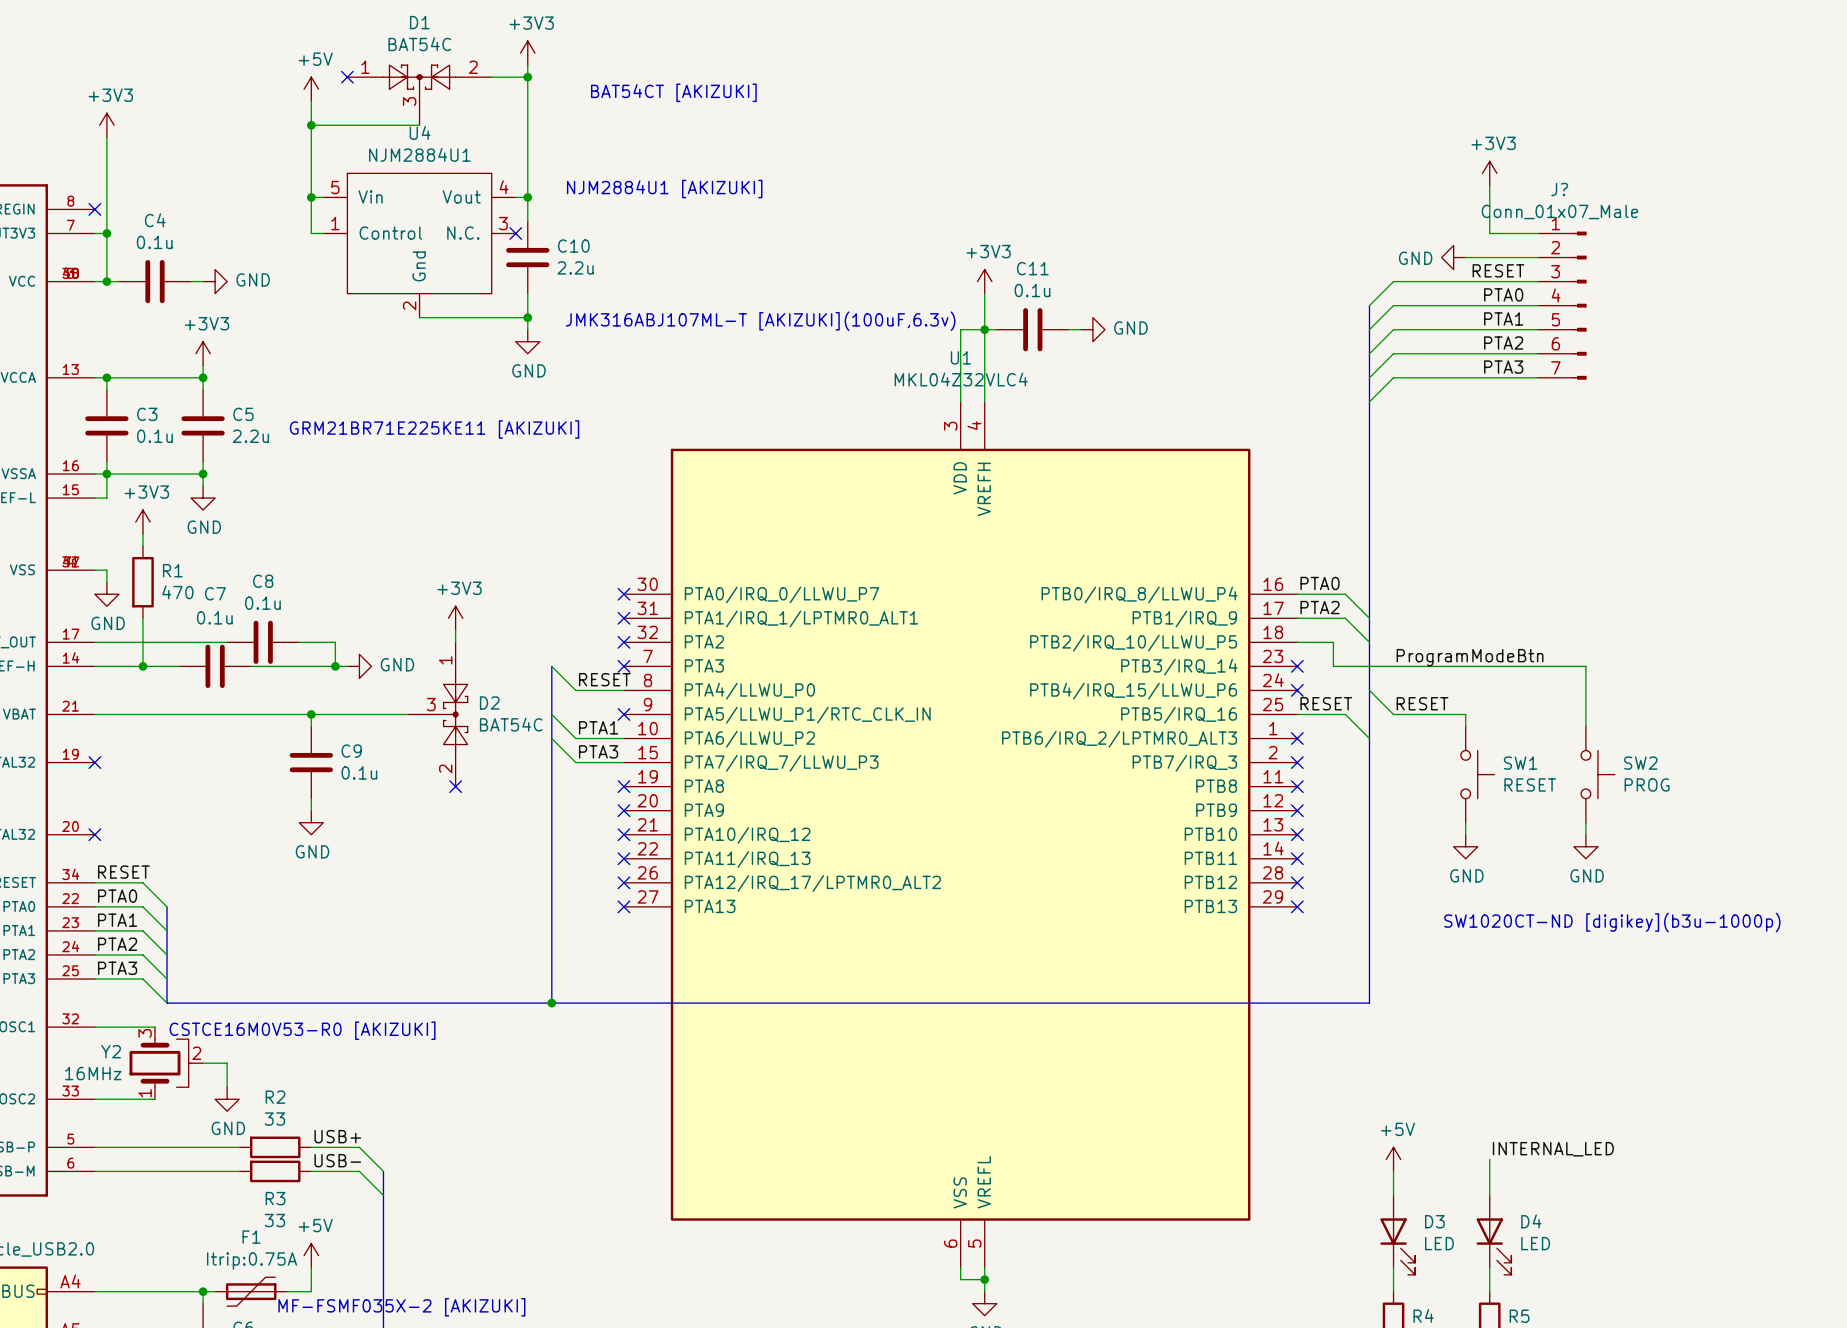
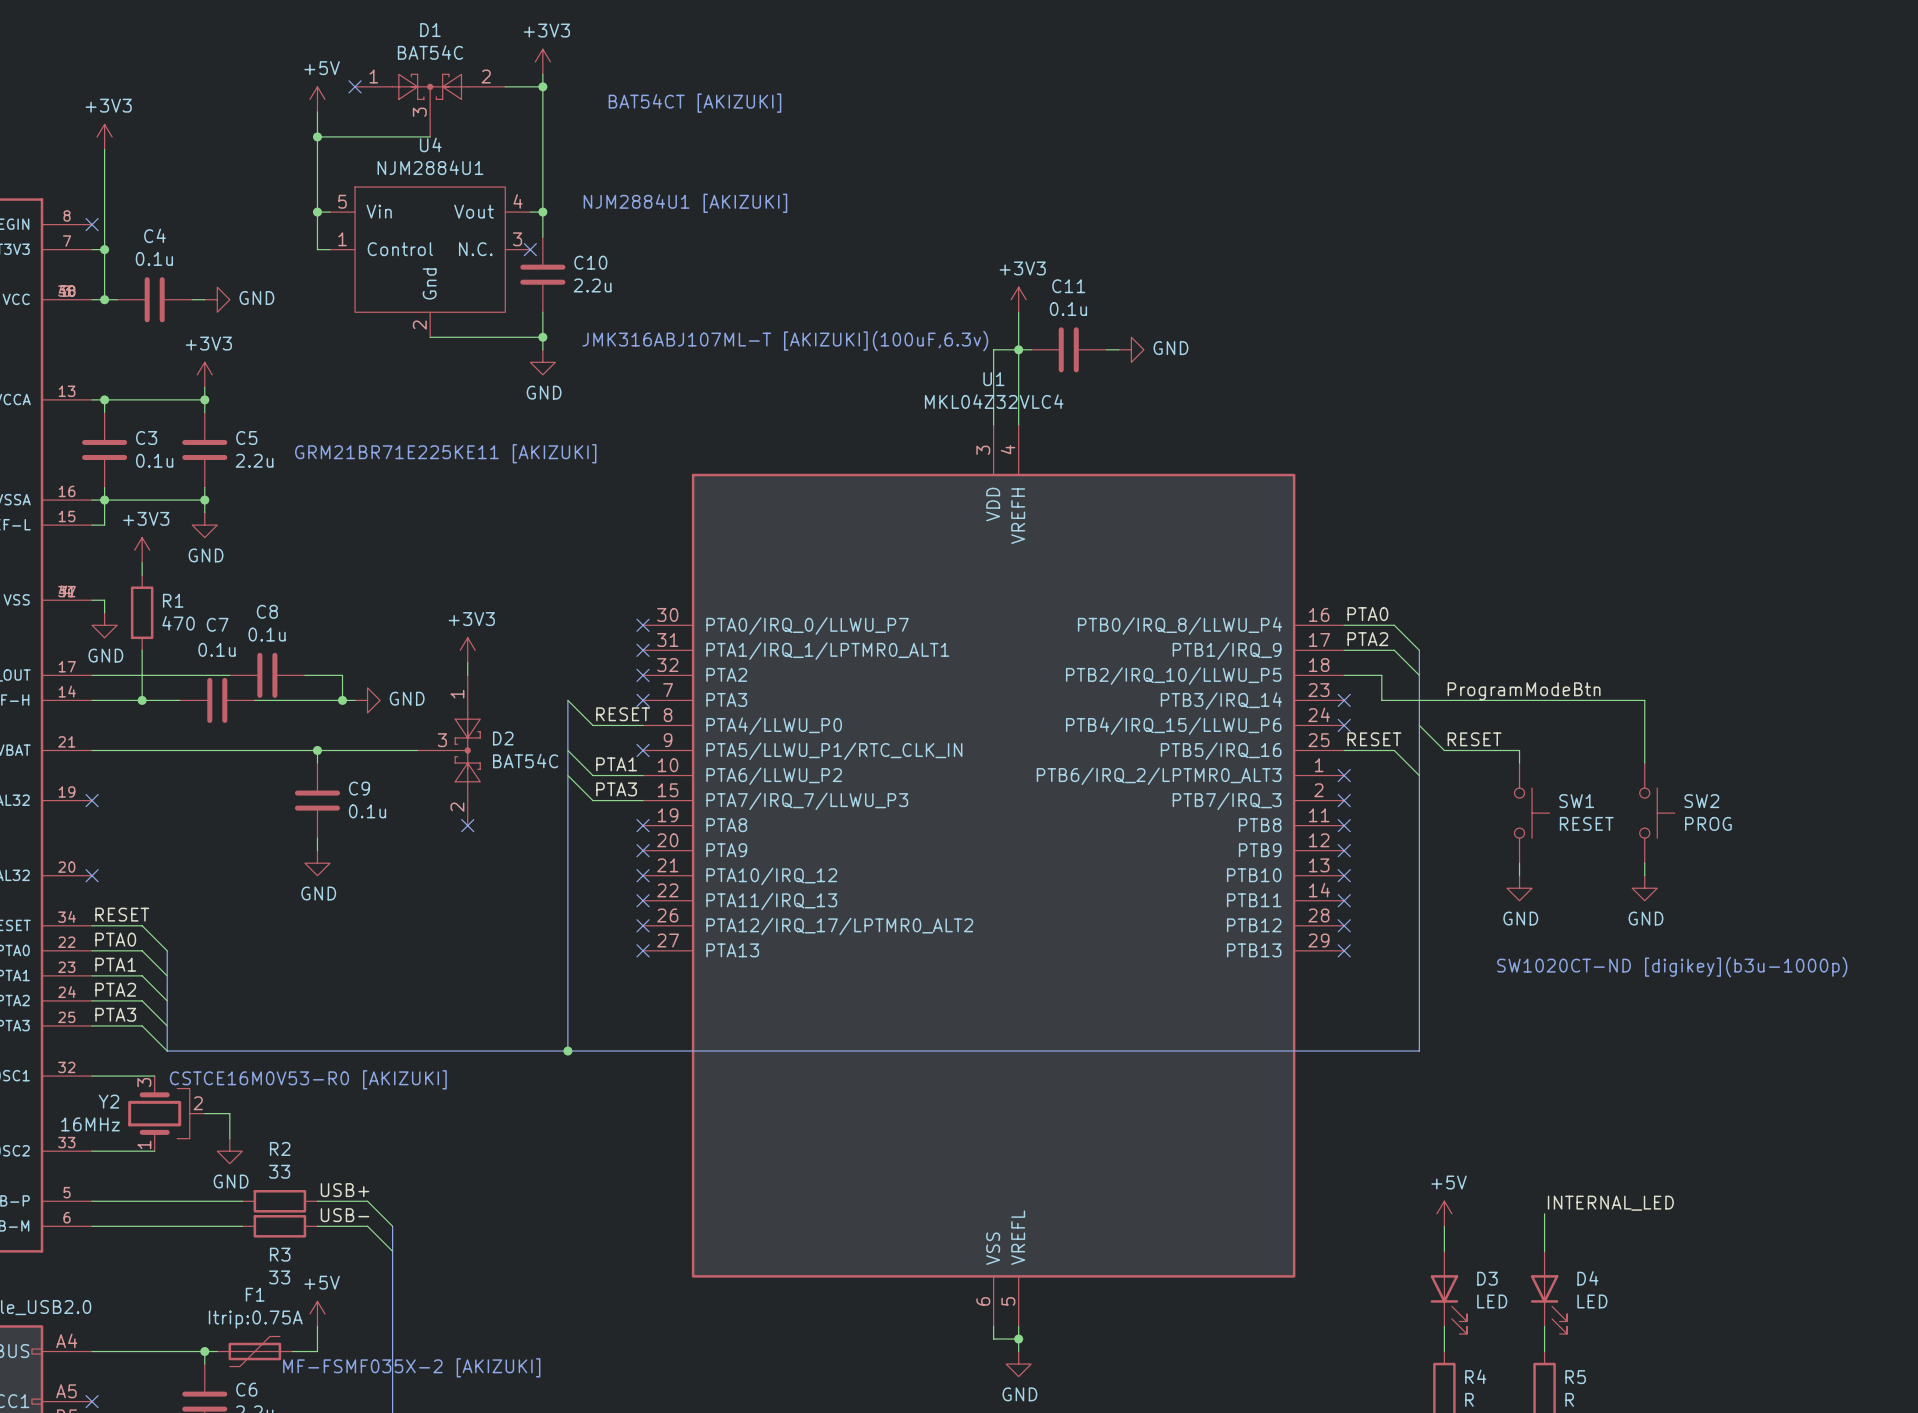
power symbol: +3V3 (1489, 173) -> none
wire: (1489, 185) (1489, 233) (1537, 233) -> none
power symbol: GND (1453, 257) -> none
wire: (1465, 257) (1537, 257) -> none
label: RESET (1498, 270) -> none
wire: (1537, 281) (1393, 281) (1369, 305) -> none
label: PTA0 (1503, 294) -> none
bus: (1369, 305) (1369, 618) -> none
wire: (1537, 305) (1393, 305) (1369, 329) -> none
J?: Conn_01x07_Male (1562, 305) -> none
label: PTA1 (1503, 318) -> none
wire: (1537, 329) (1393, 329) (1369, 353) -> none
label: PTA2 (1503, 343) -> none
wire: (1537, 353) (1393, 353) (1369, 377) -> none
label: PTA3 (1503, 367) -> none
wire: (1537, 377) (1393, 377) (1369, 401) -> none

